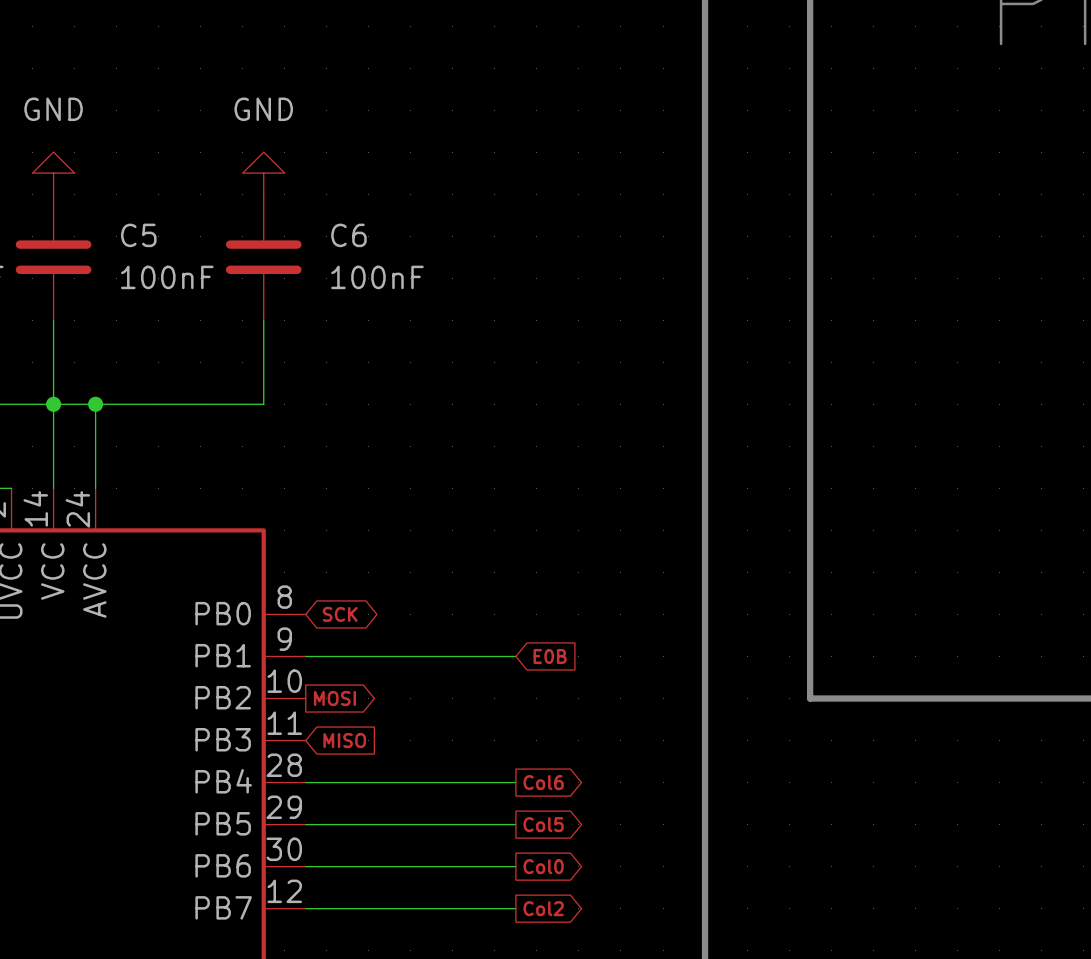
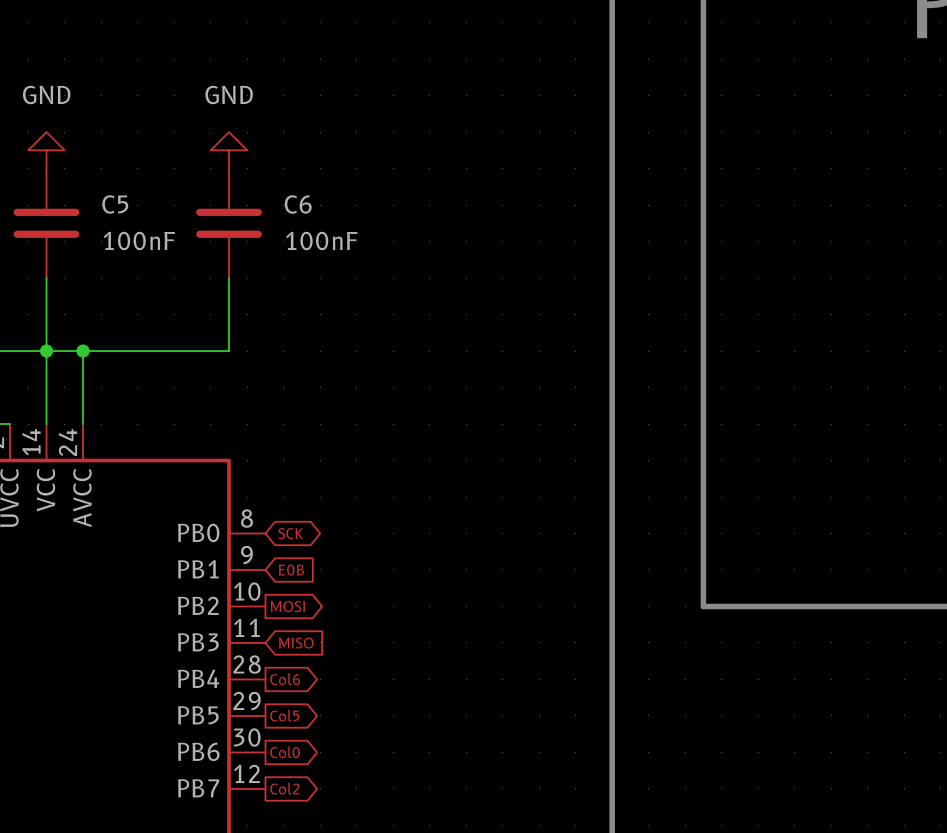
wire: (305, 656) (515, 656) -> none
global label position: E0B (550, 656) -> E0B (291, 570)
wire: (305, 782) (515, 782) -> none
global label position: Col6 (543, 782) -> Col6 (285, 679)
wire: (305, 824) (515, 824) -> none
global label position: Col5 (543, 824) -> Col5 (284, 715)
wire: (305, 866) (515, 866) -> none
global label position: Col0 (543, 866) -> Col0 (285, 752)
wire: (305, 908) (515, 908) -> none
global label position: Col2 (543, 908) -> Col2 (284, 788)

